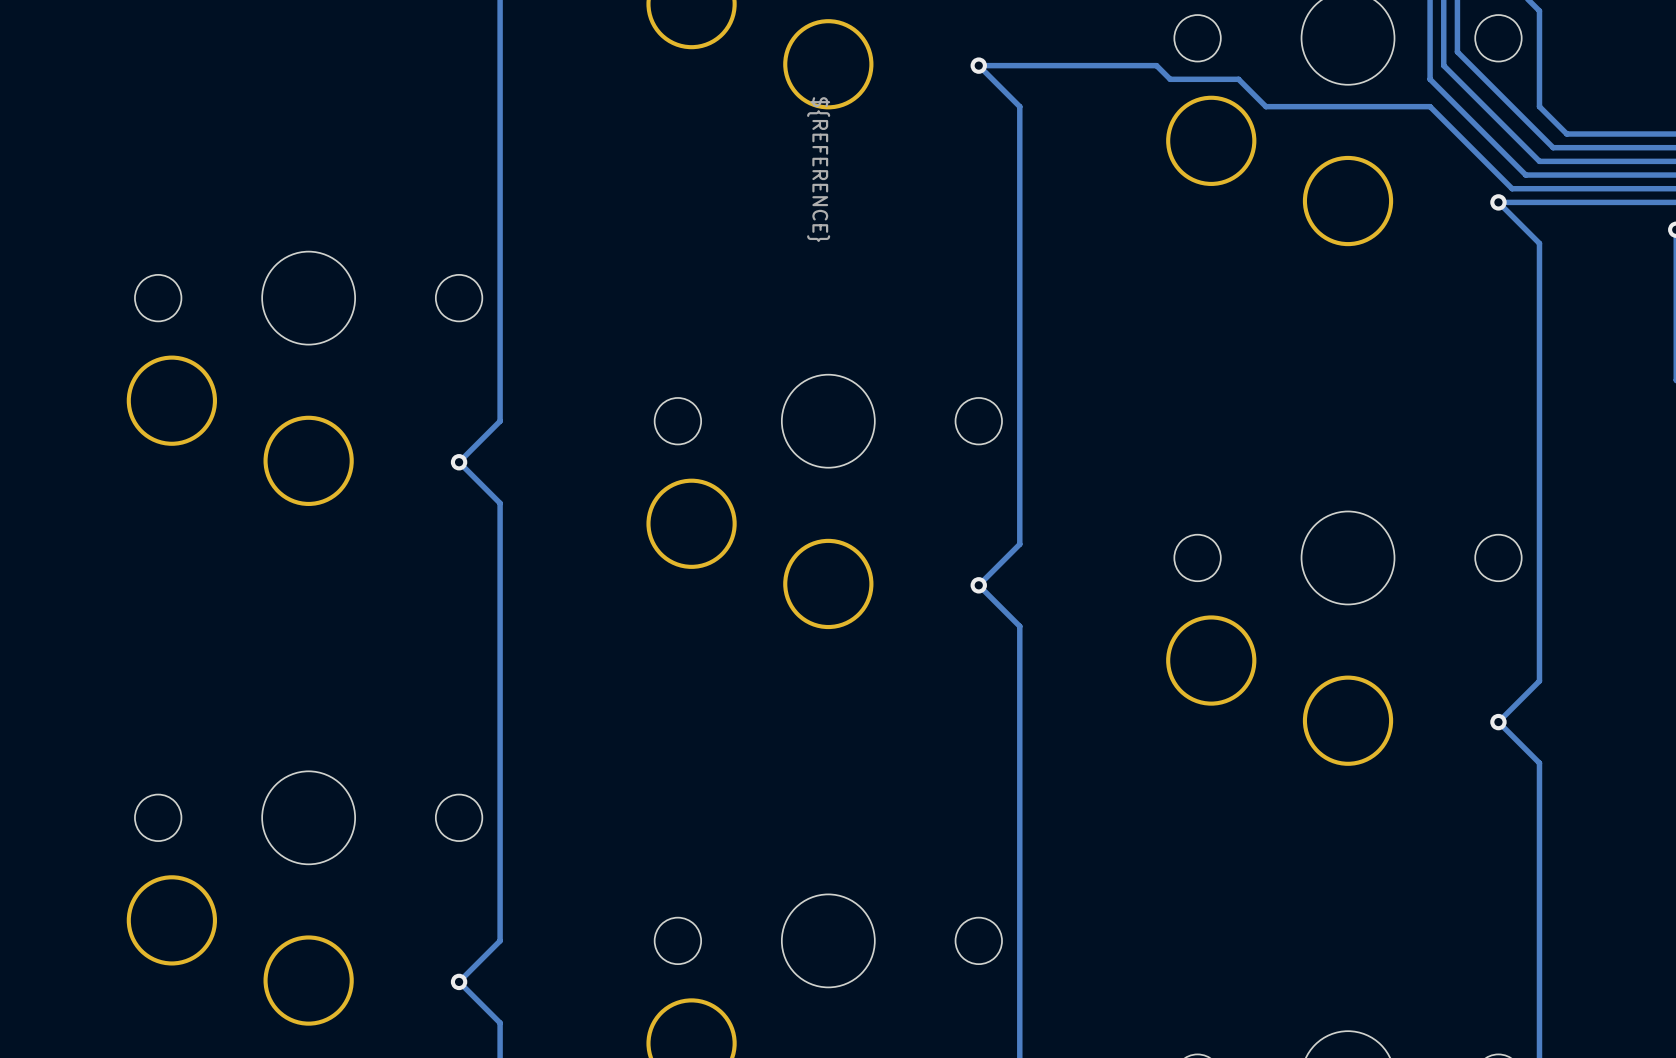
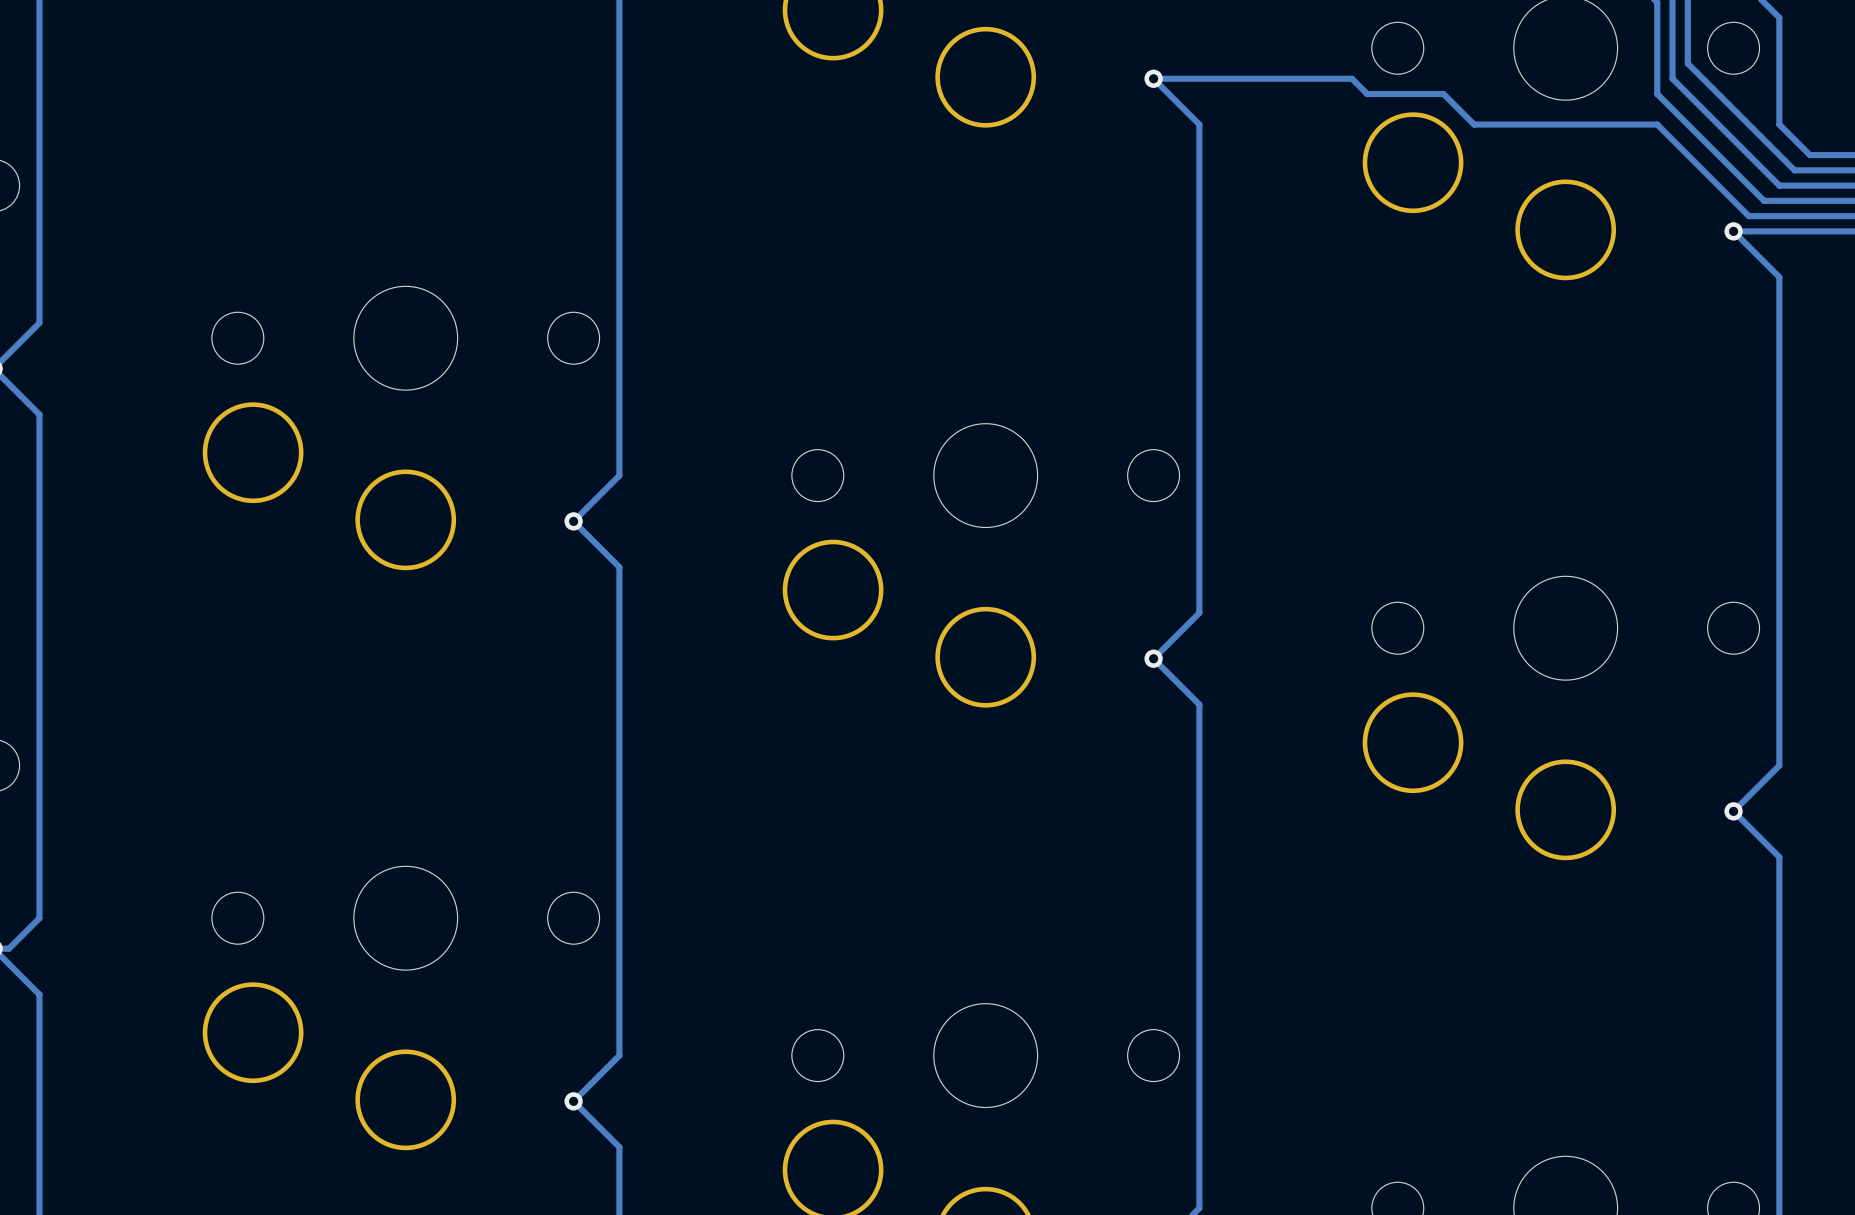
text: ${REFERENCE} (818, 169) -> none

